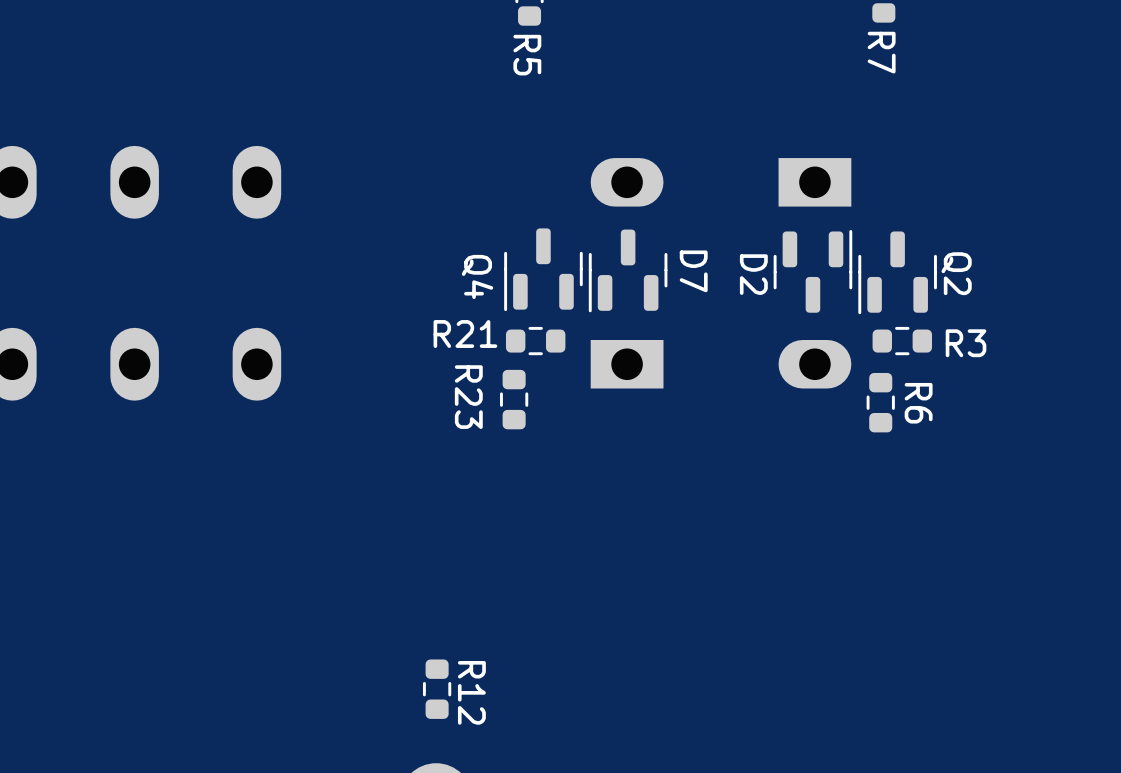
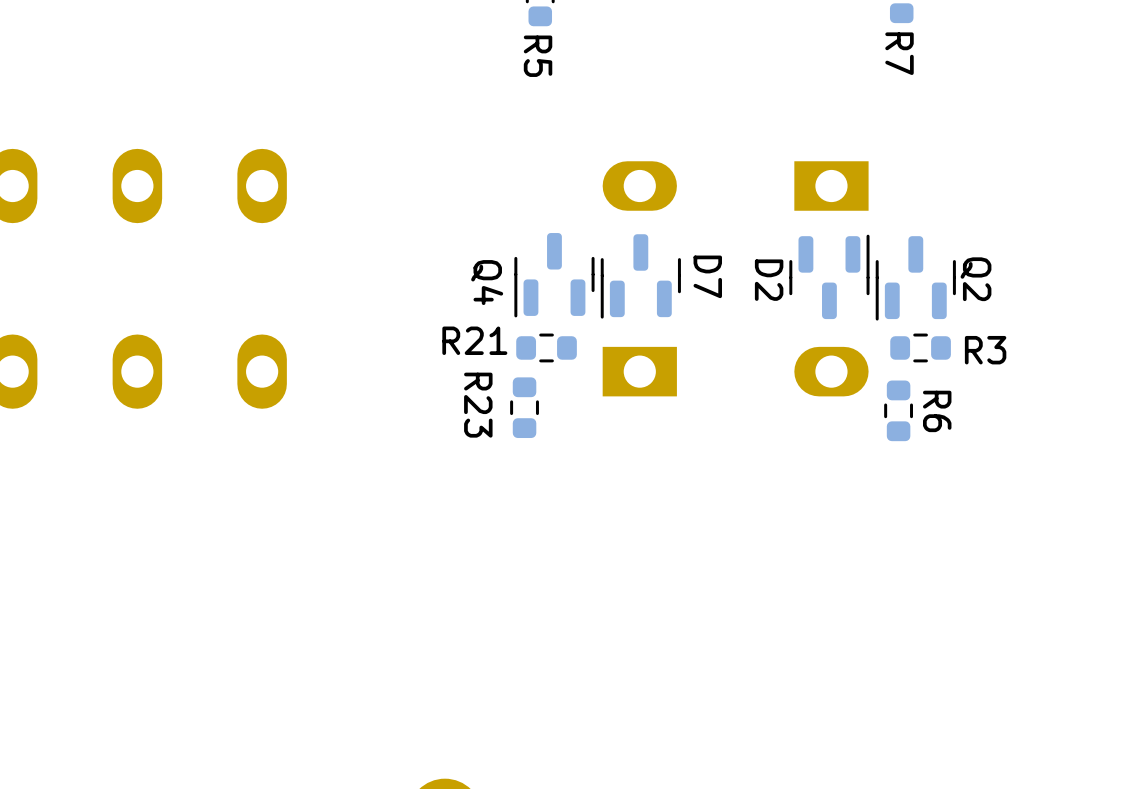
R12: (437, 689) -> none

